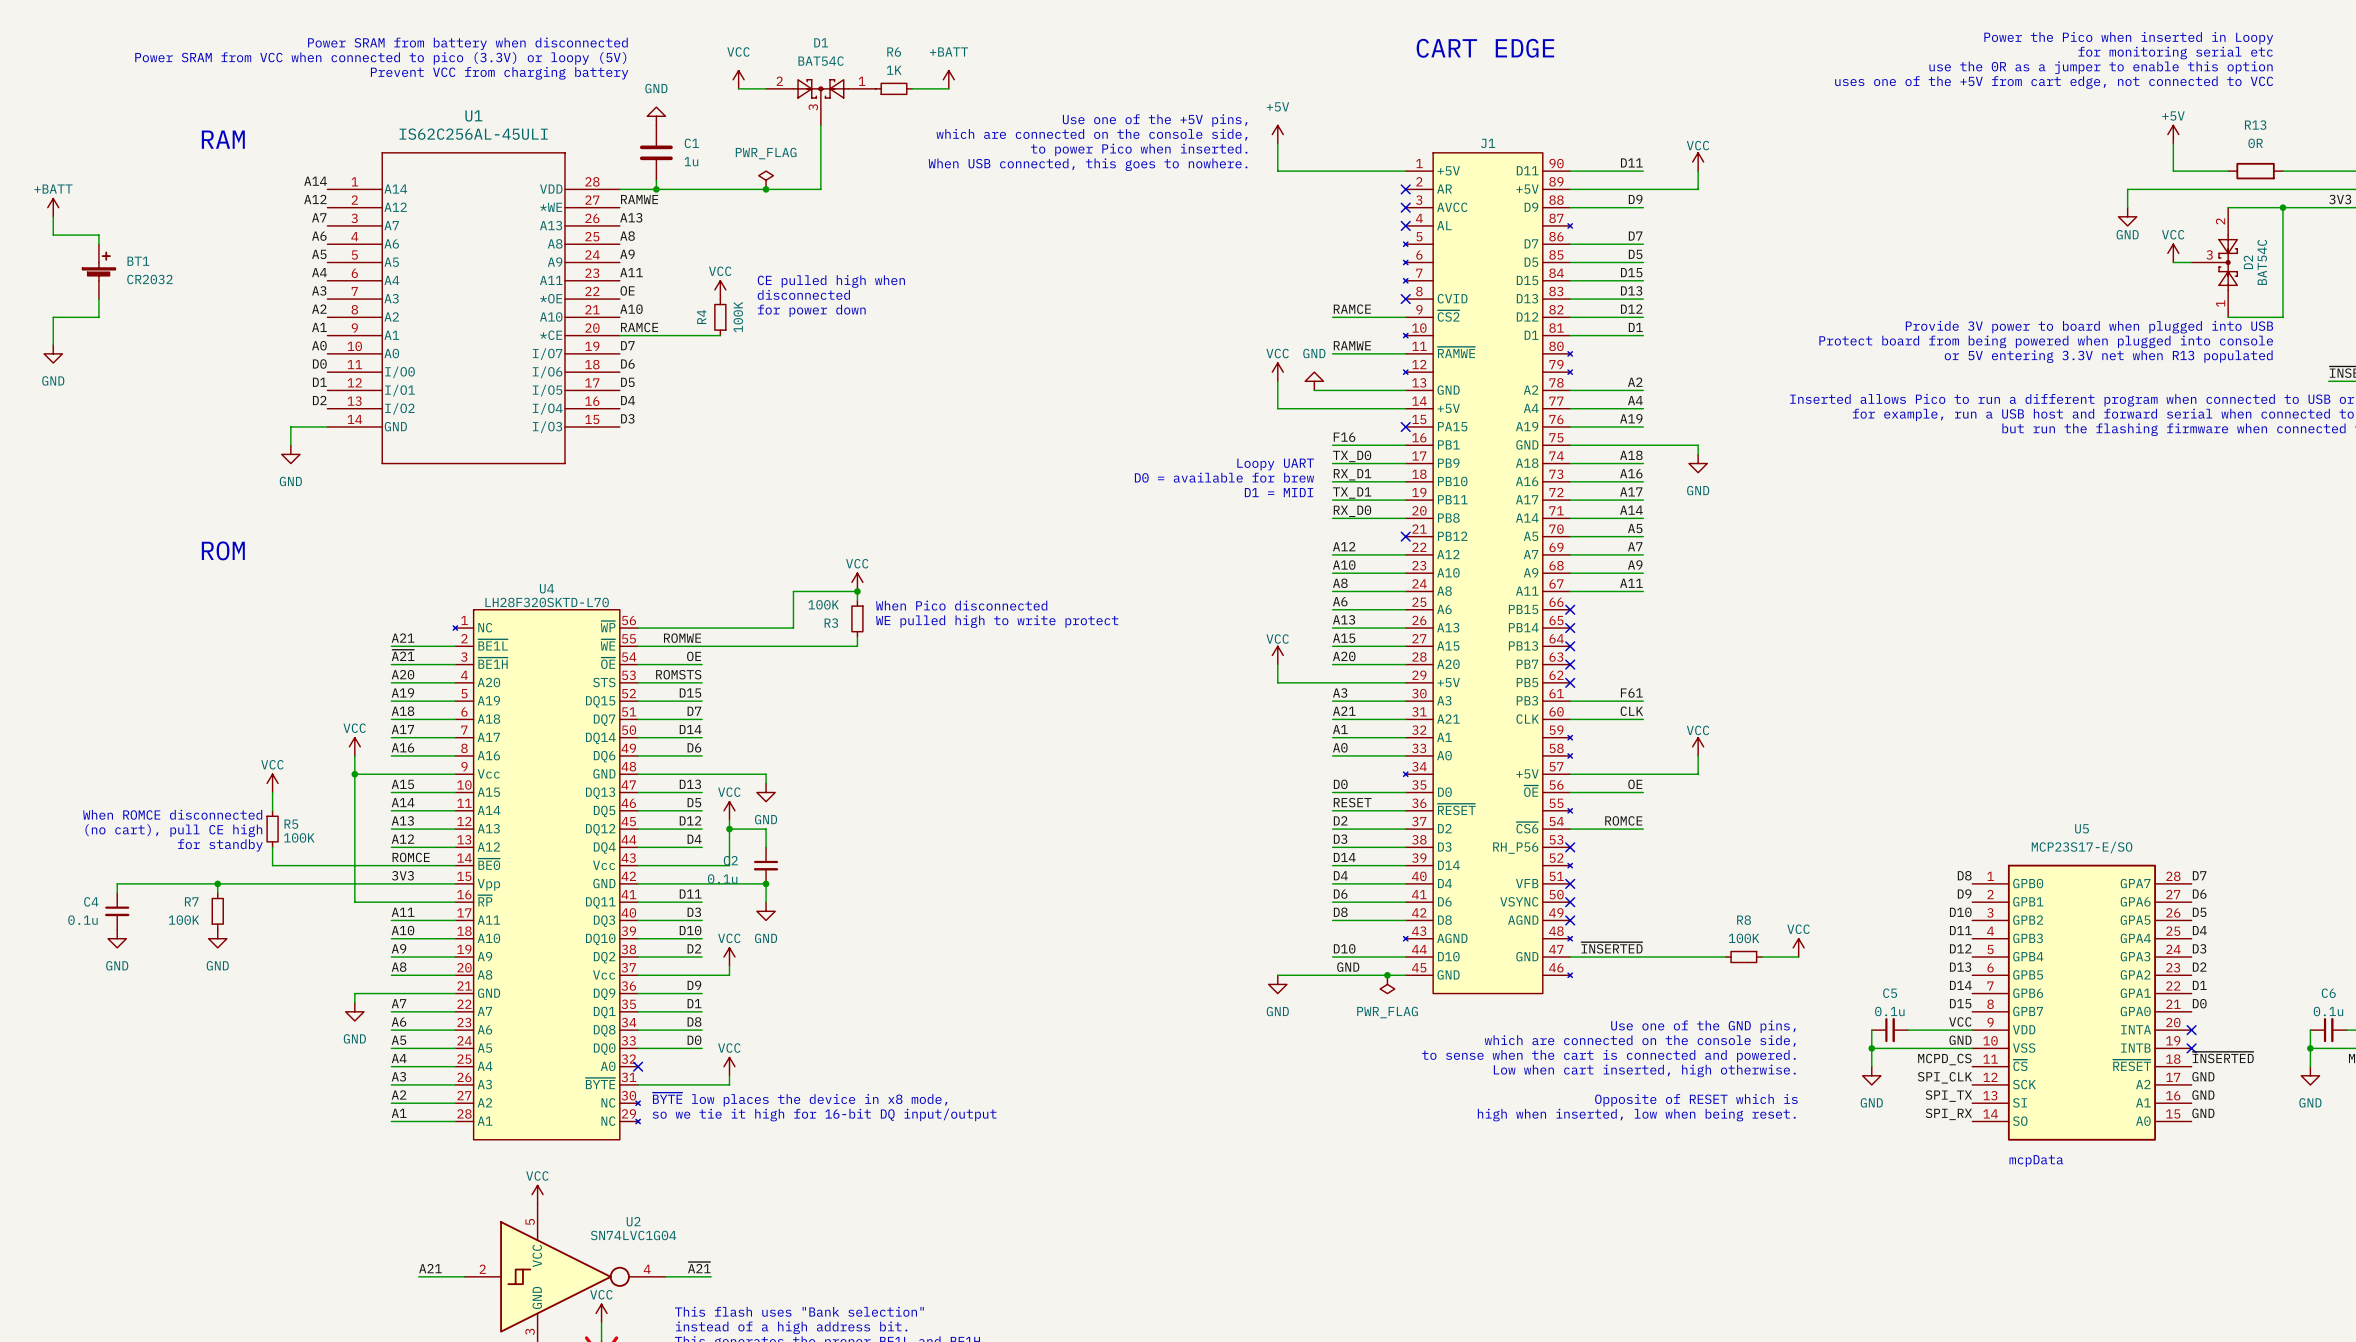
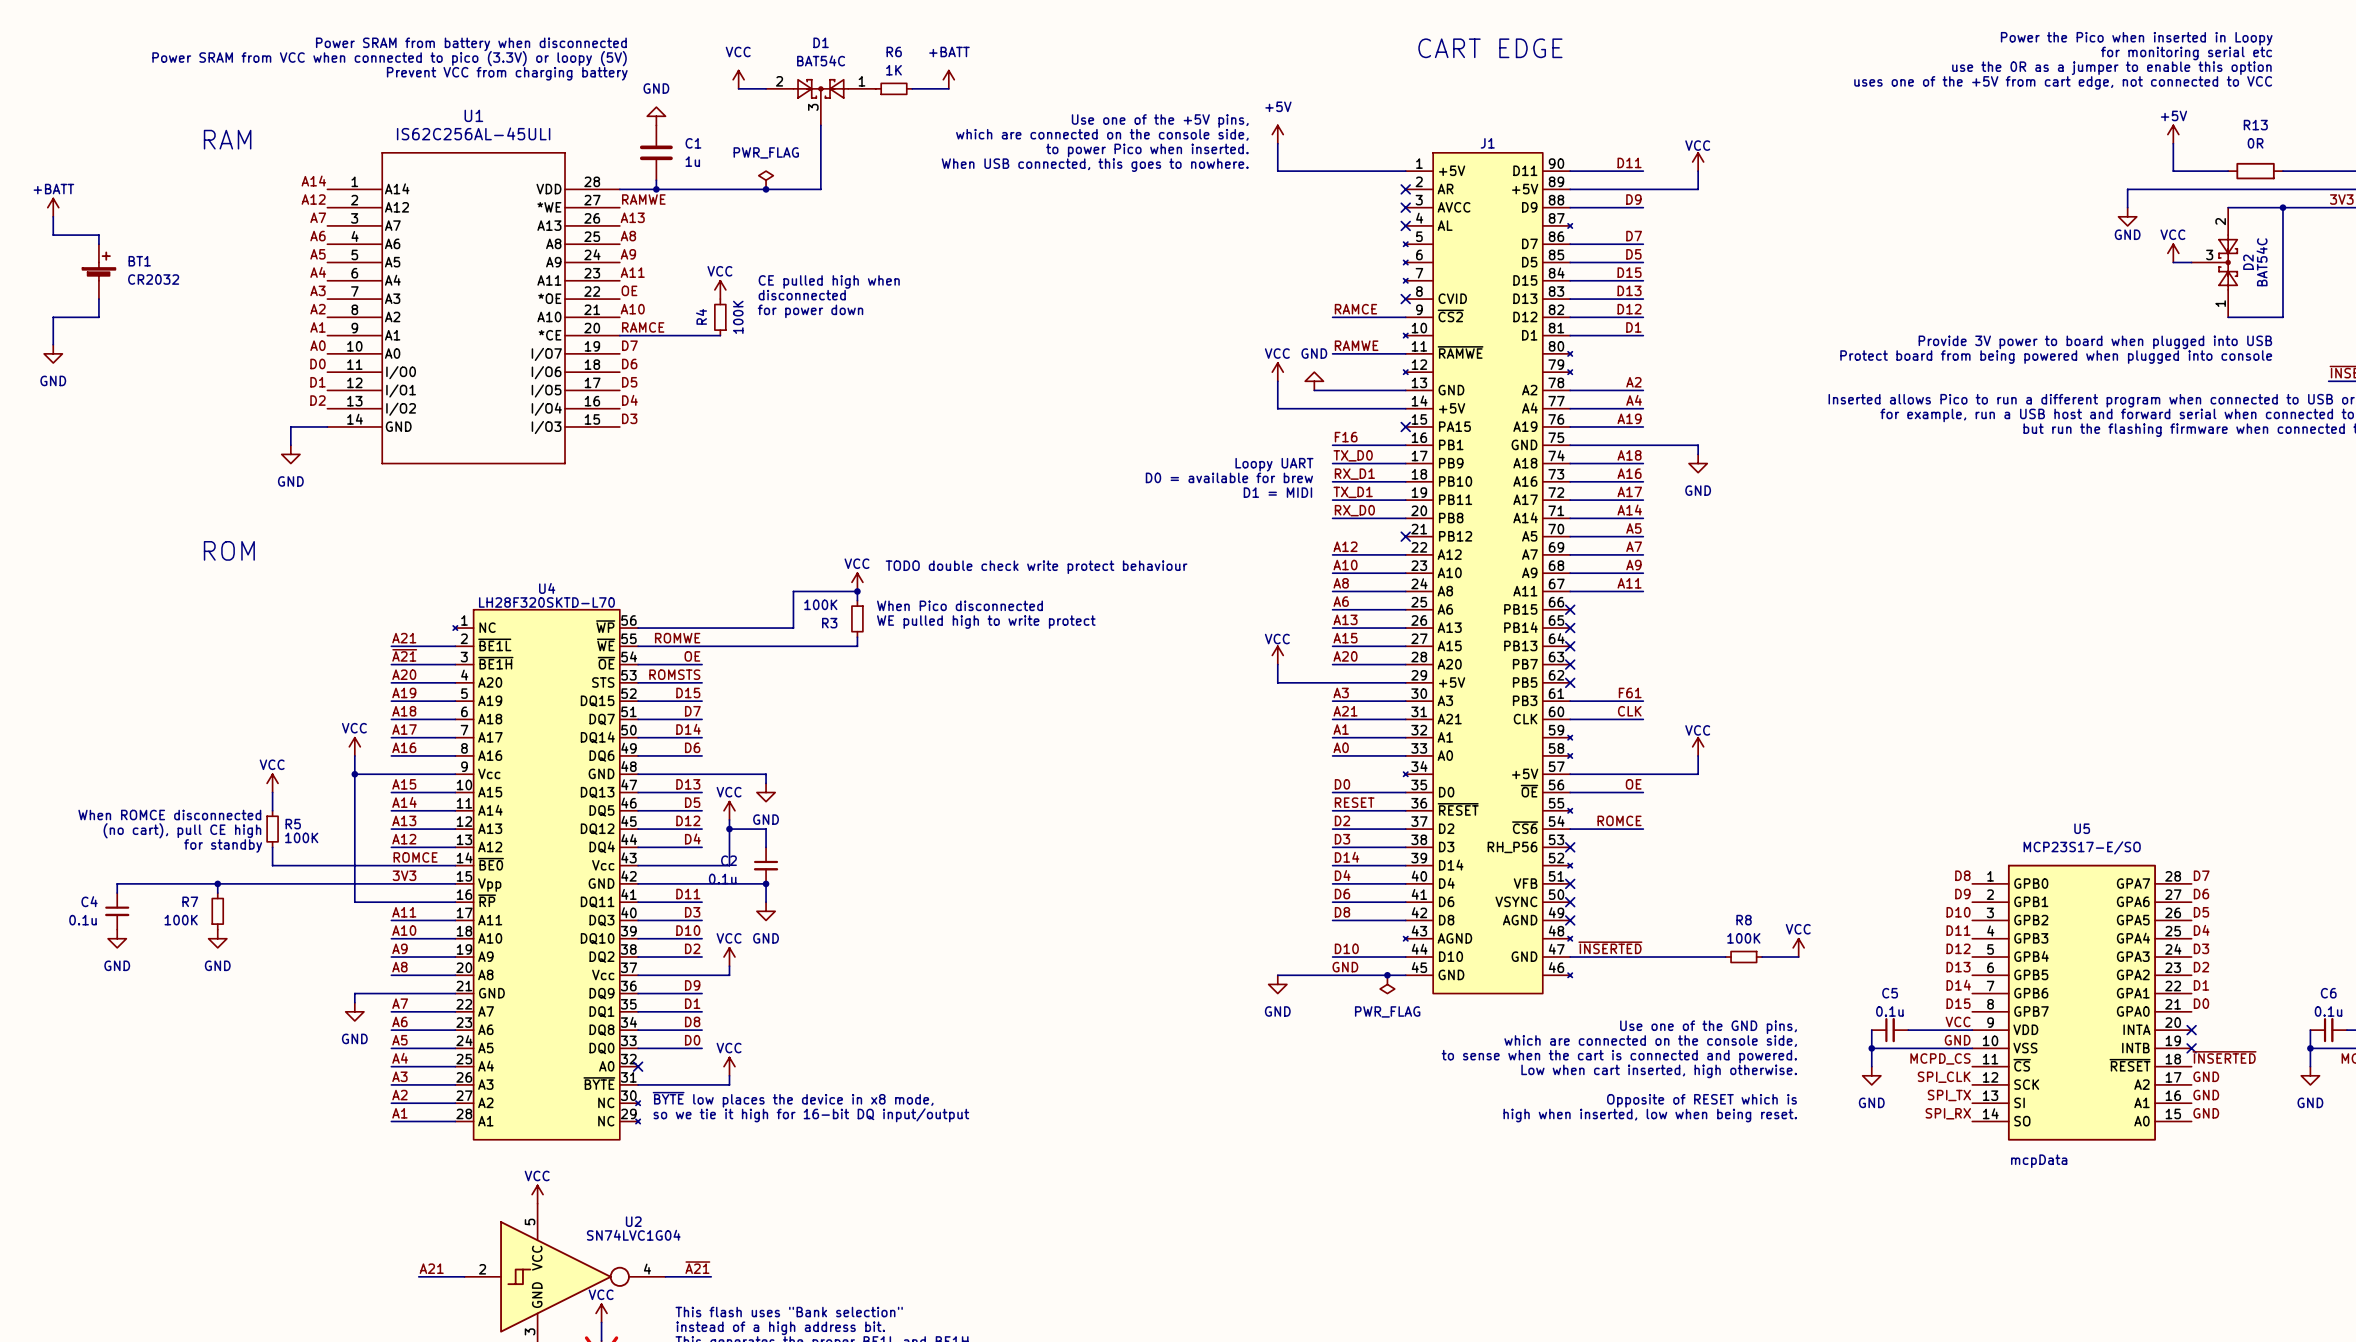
text: Provide 3V power to board when plugged into USB (2089, 327) -> none
text: Protect board from being powered when plugged into console (2046, 341) -> Provide 3V power to board when plugged into USB (2095, 342)
text: or 5V entering 3.3V net when R13 populated (2108, 356) -> Protect board from being powered when plugged into console (2056, 357)
text: none -> TODO double check write protect behaviour (1036, 567)

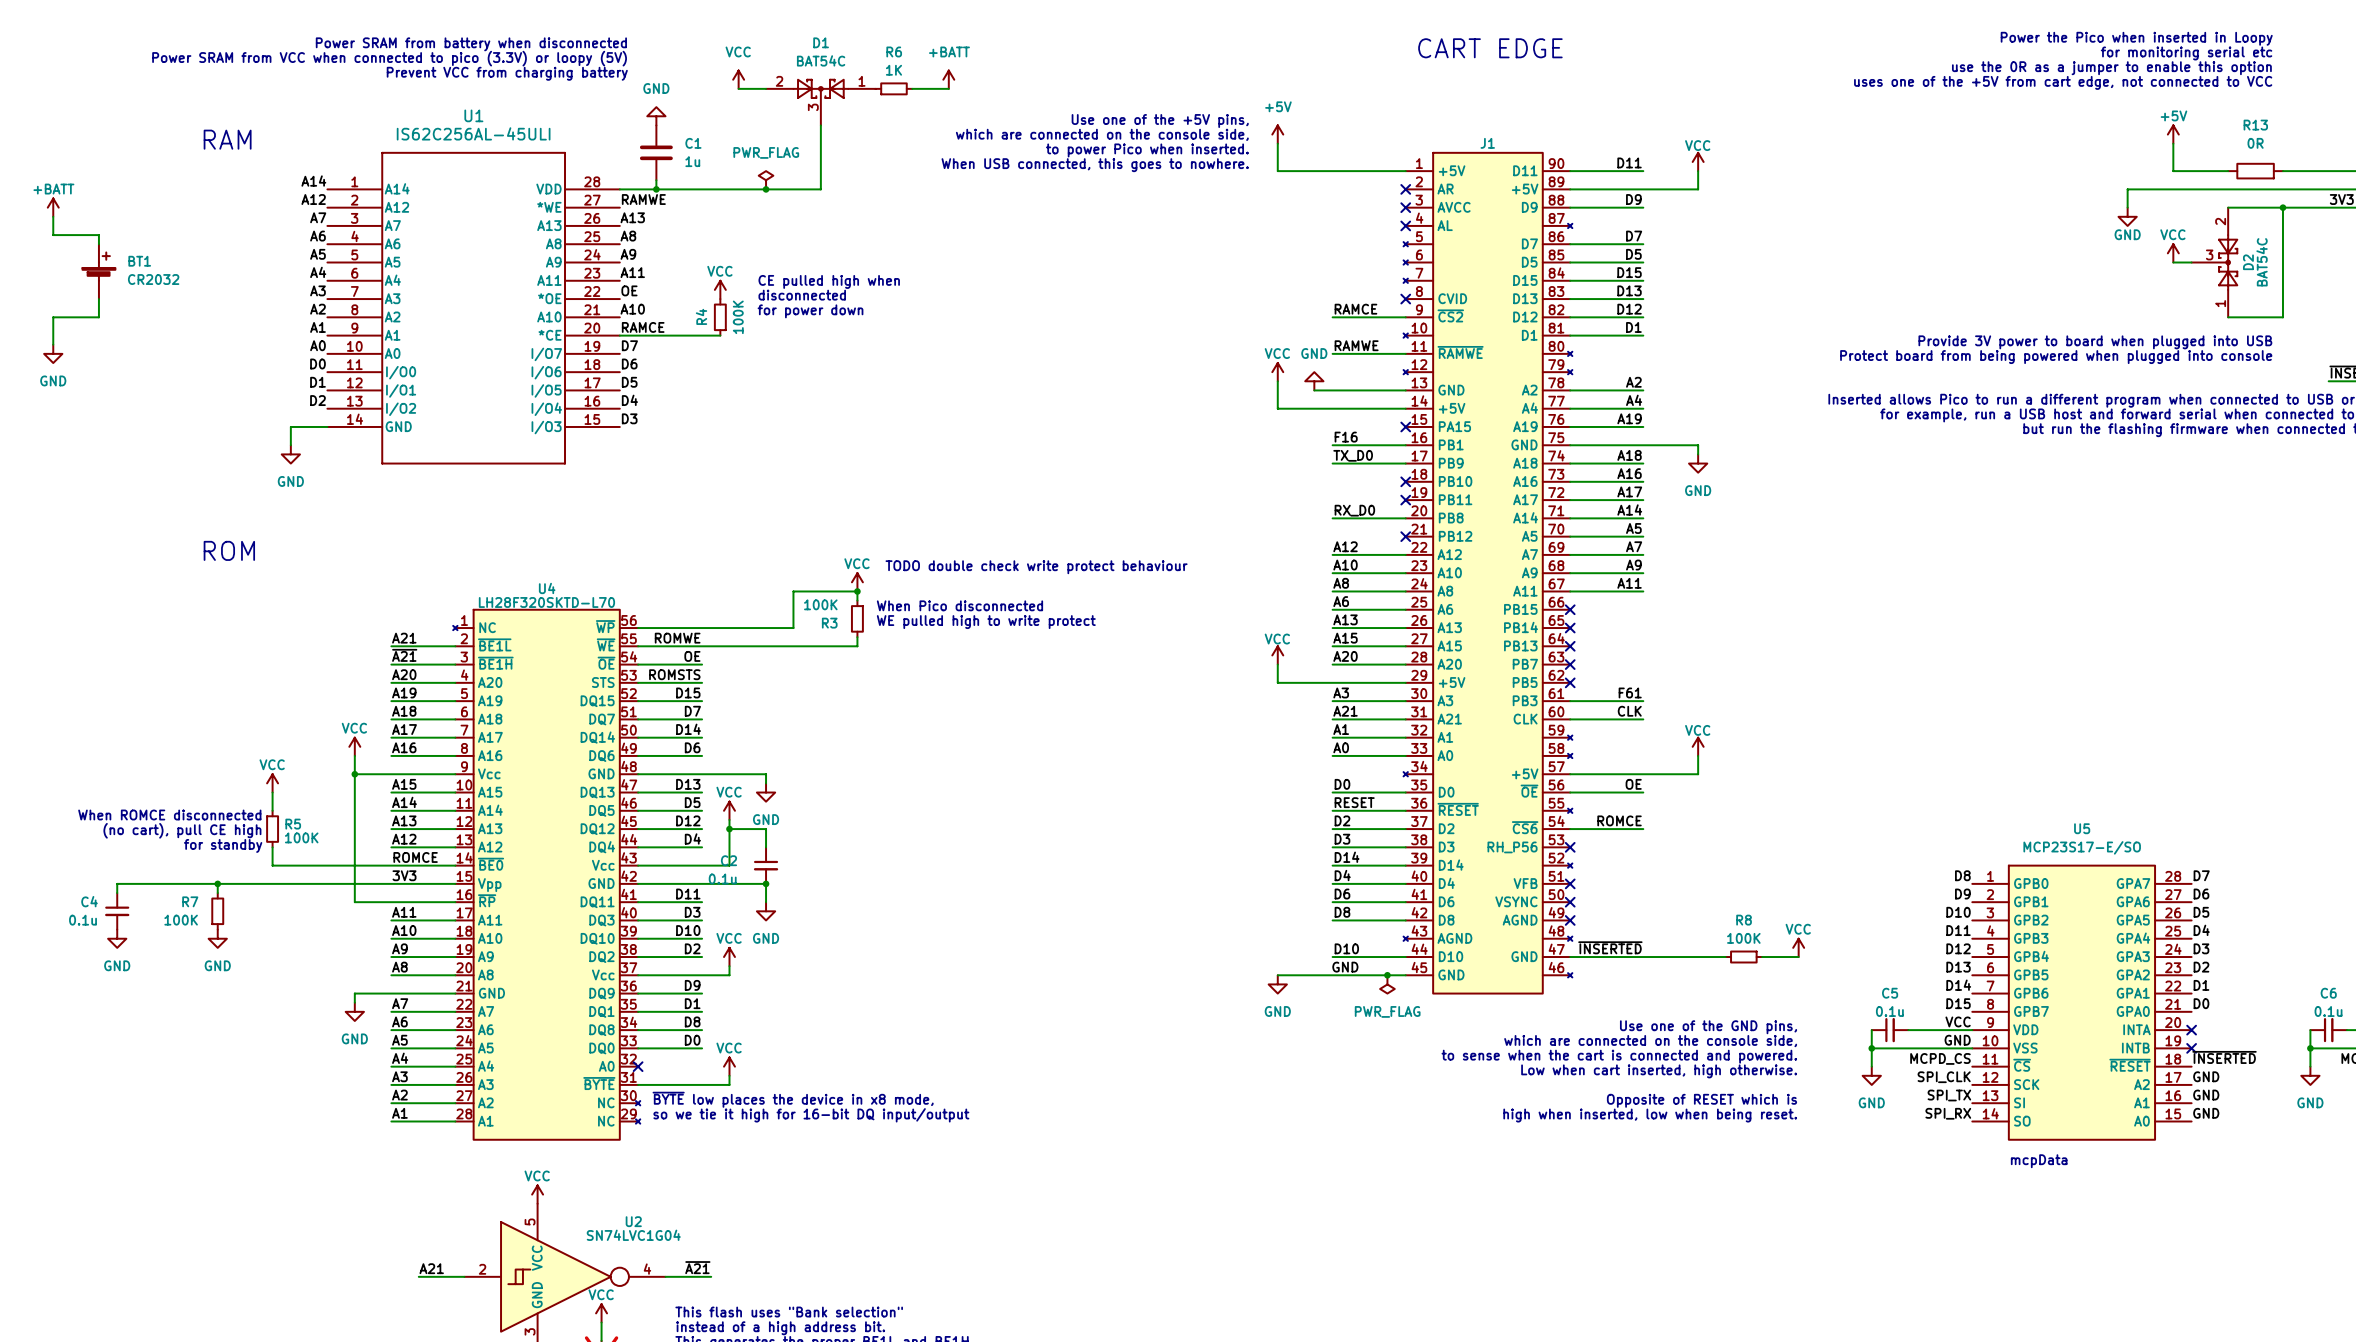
text: Loopy UART (1274, 464) -> none
label: RX_D1 (1354, 474) -> none
text: D0 = available for brew (1229, 477) -> none
wire: (1332, 481) (1405, 481) -> none
no-connect mark: none -> (1405, 481)
text: D1 = MIDI (1277, 492) -> none
label: TX_D1 (1353, 492) -> none
wire: (1332, 500) (1405, 500) -> none
no-connect mark: none -> (1405, 500)

